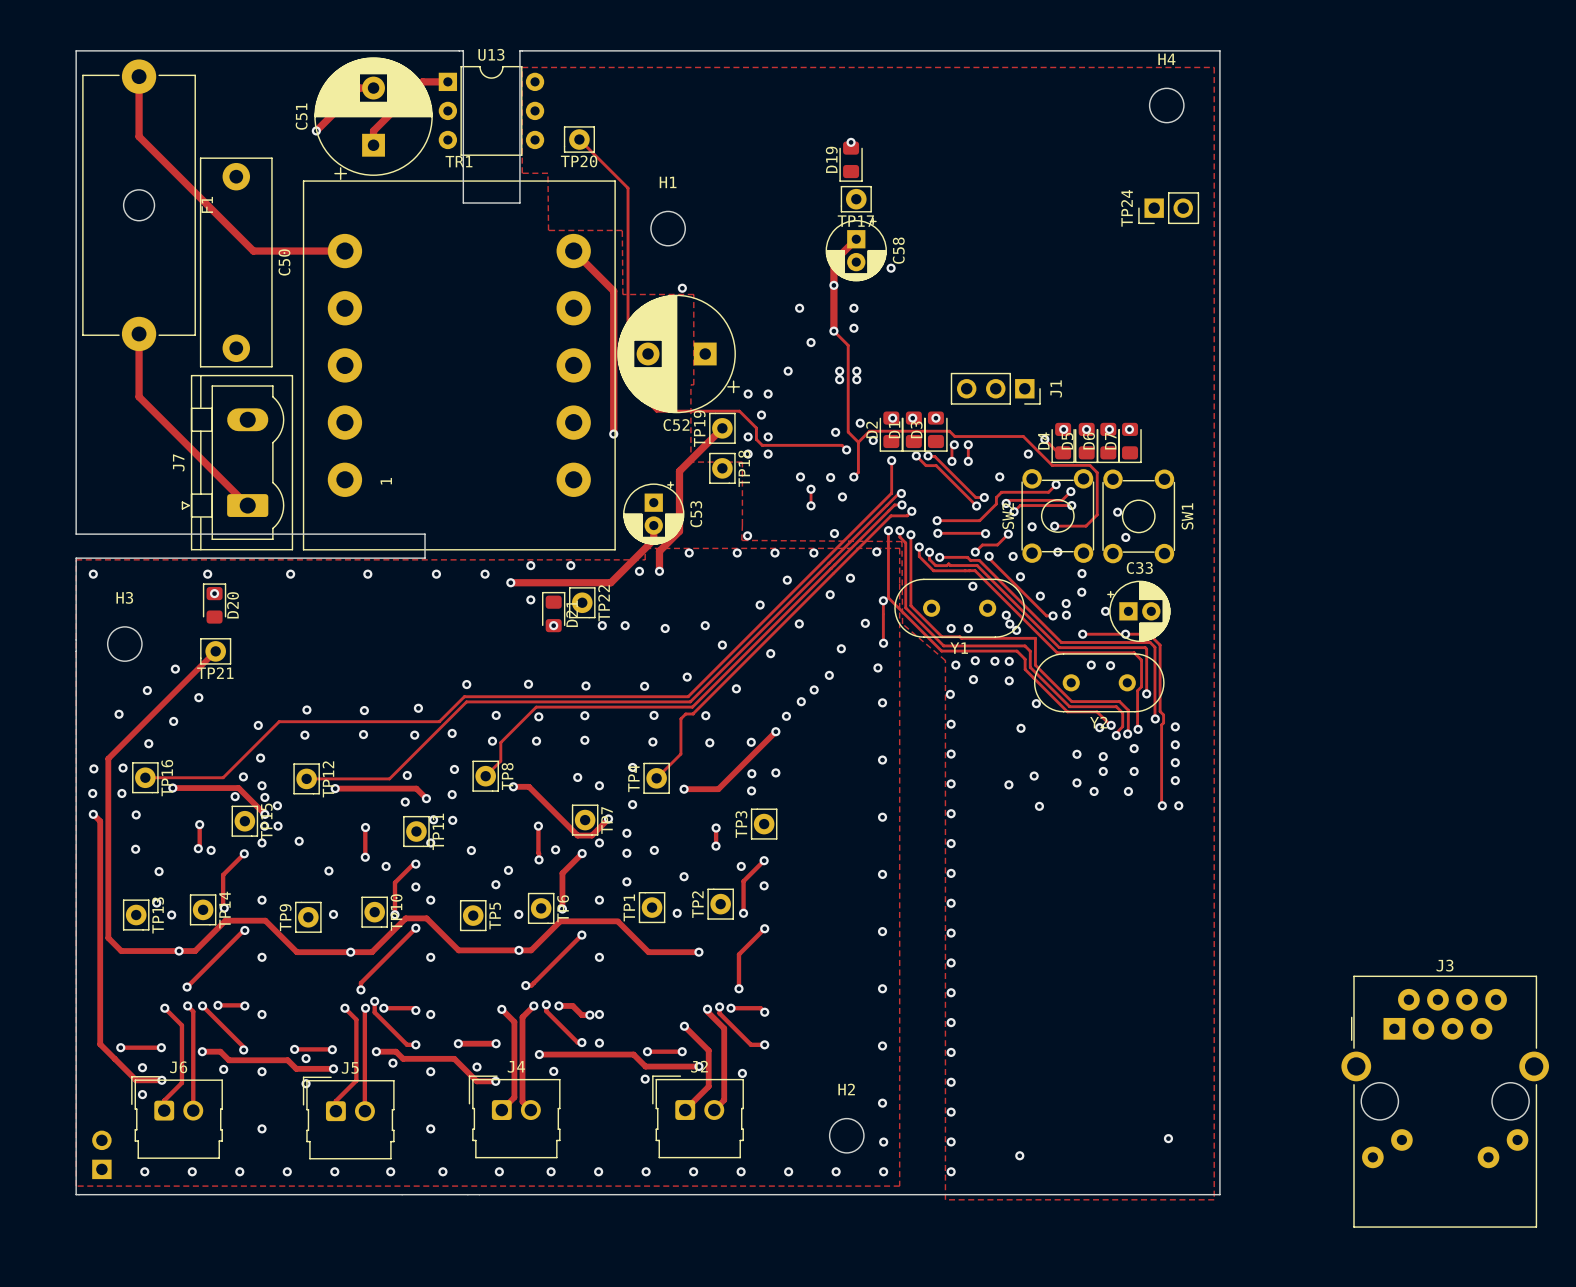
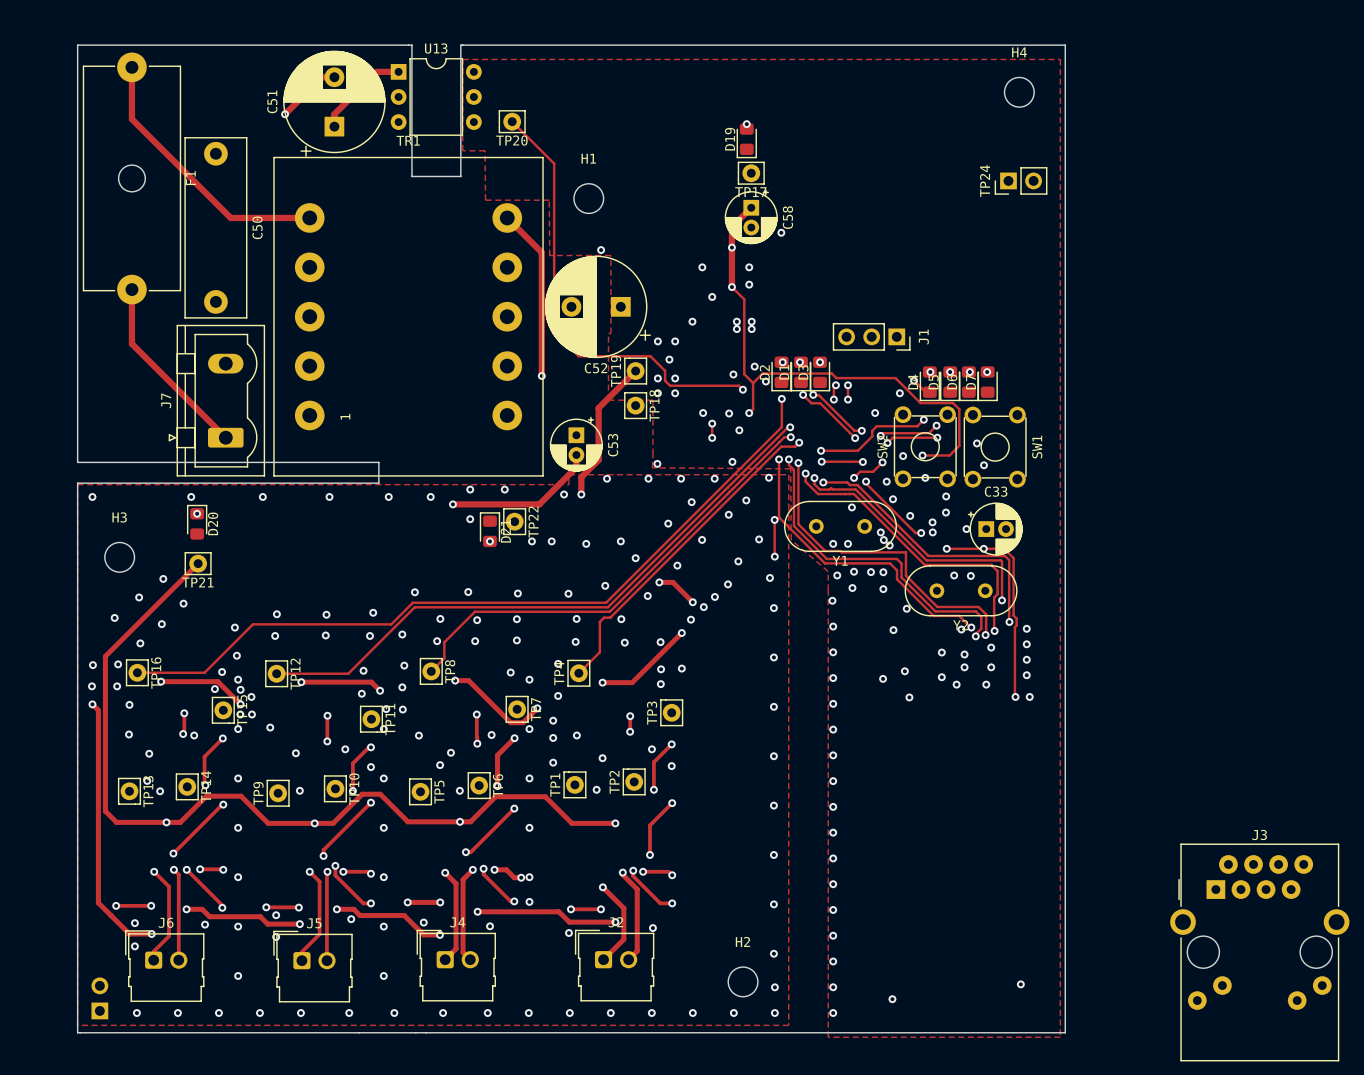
track: none -> (659, 582) (672, 582) (692, 602)
via: none -> (659, 582)
via: none -> (692, 602)

